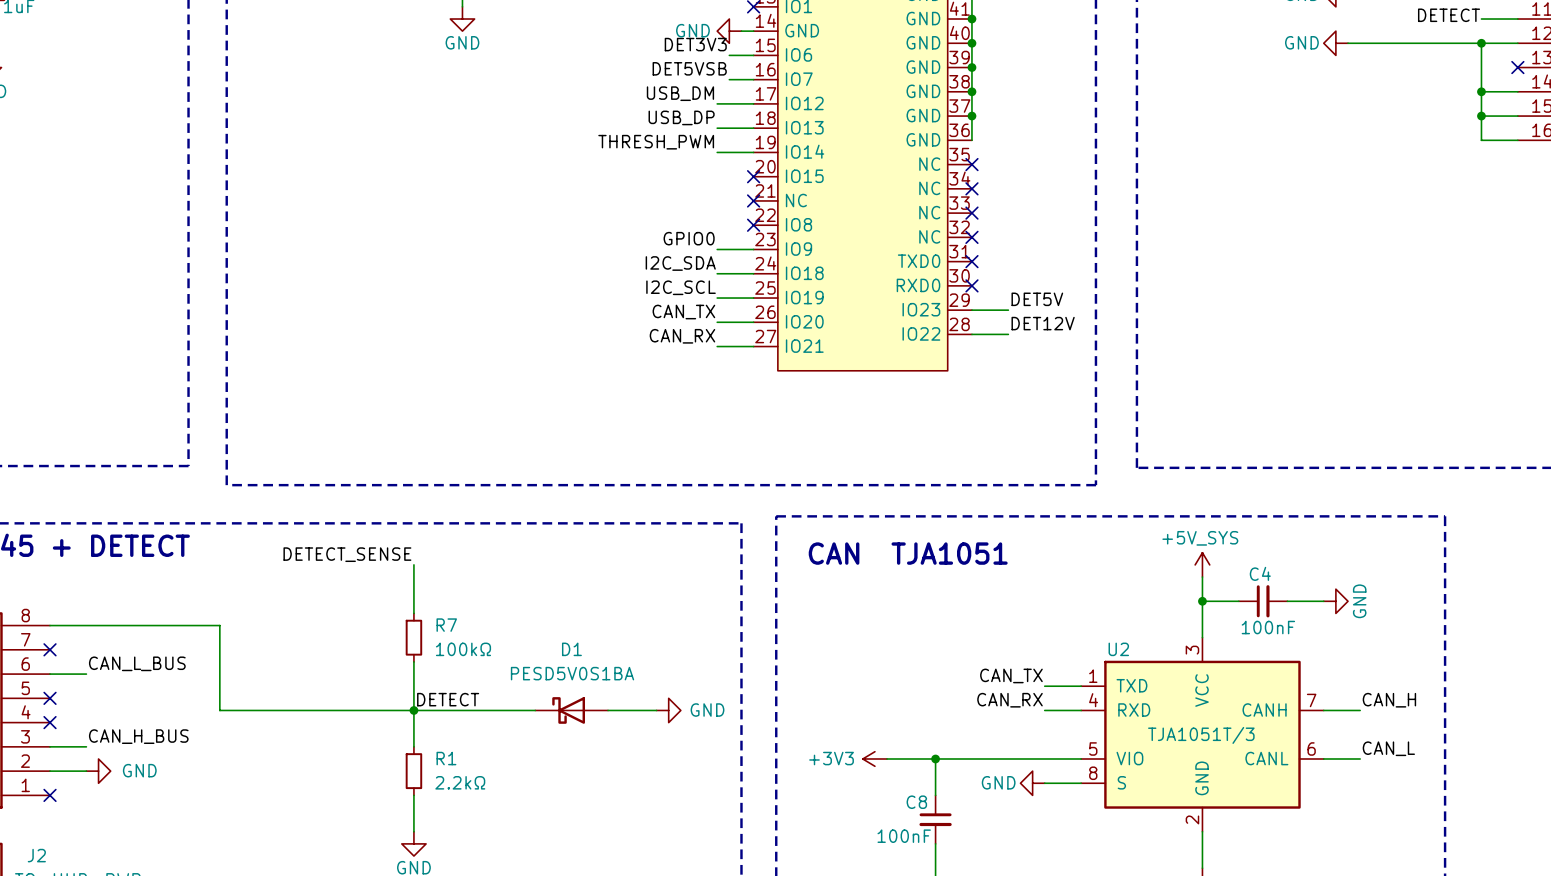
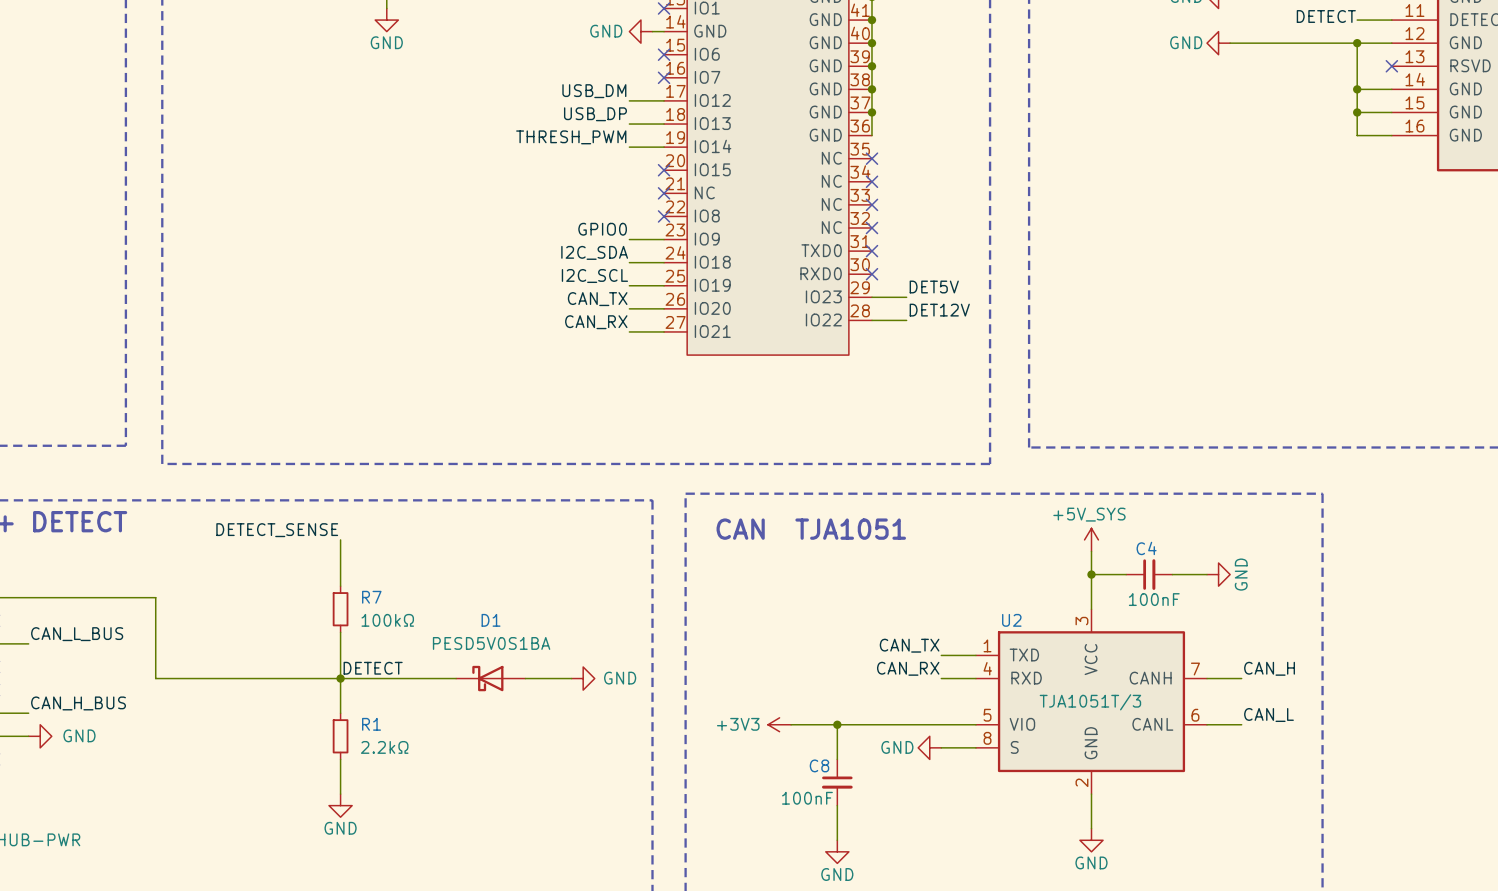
label: DET3V3 (695, 44) -> none
wire: (729, 55) (753, 55) -> none
no-connect mark: none -> (664, 54)
label: DET5VSB (689, 68) -> none
wire: (729, 79) (753, 79) -> none
no-connect mark: none -> (664, 77)

